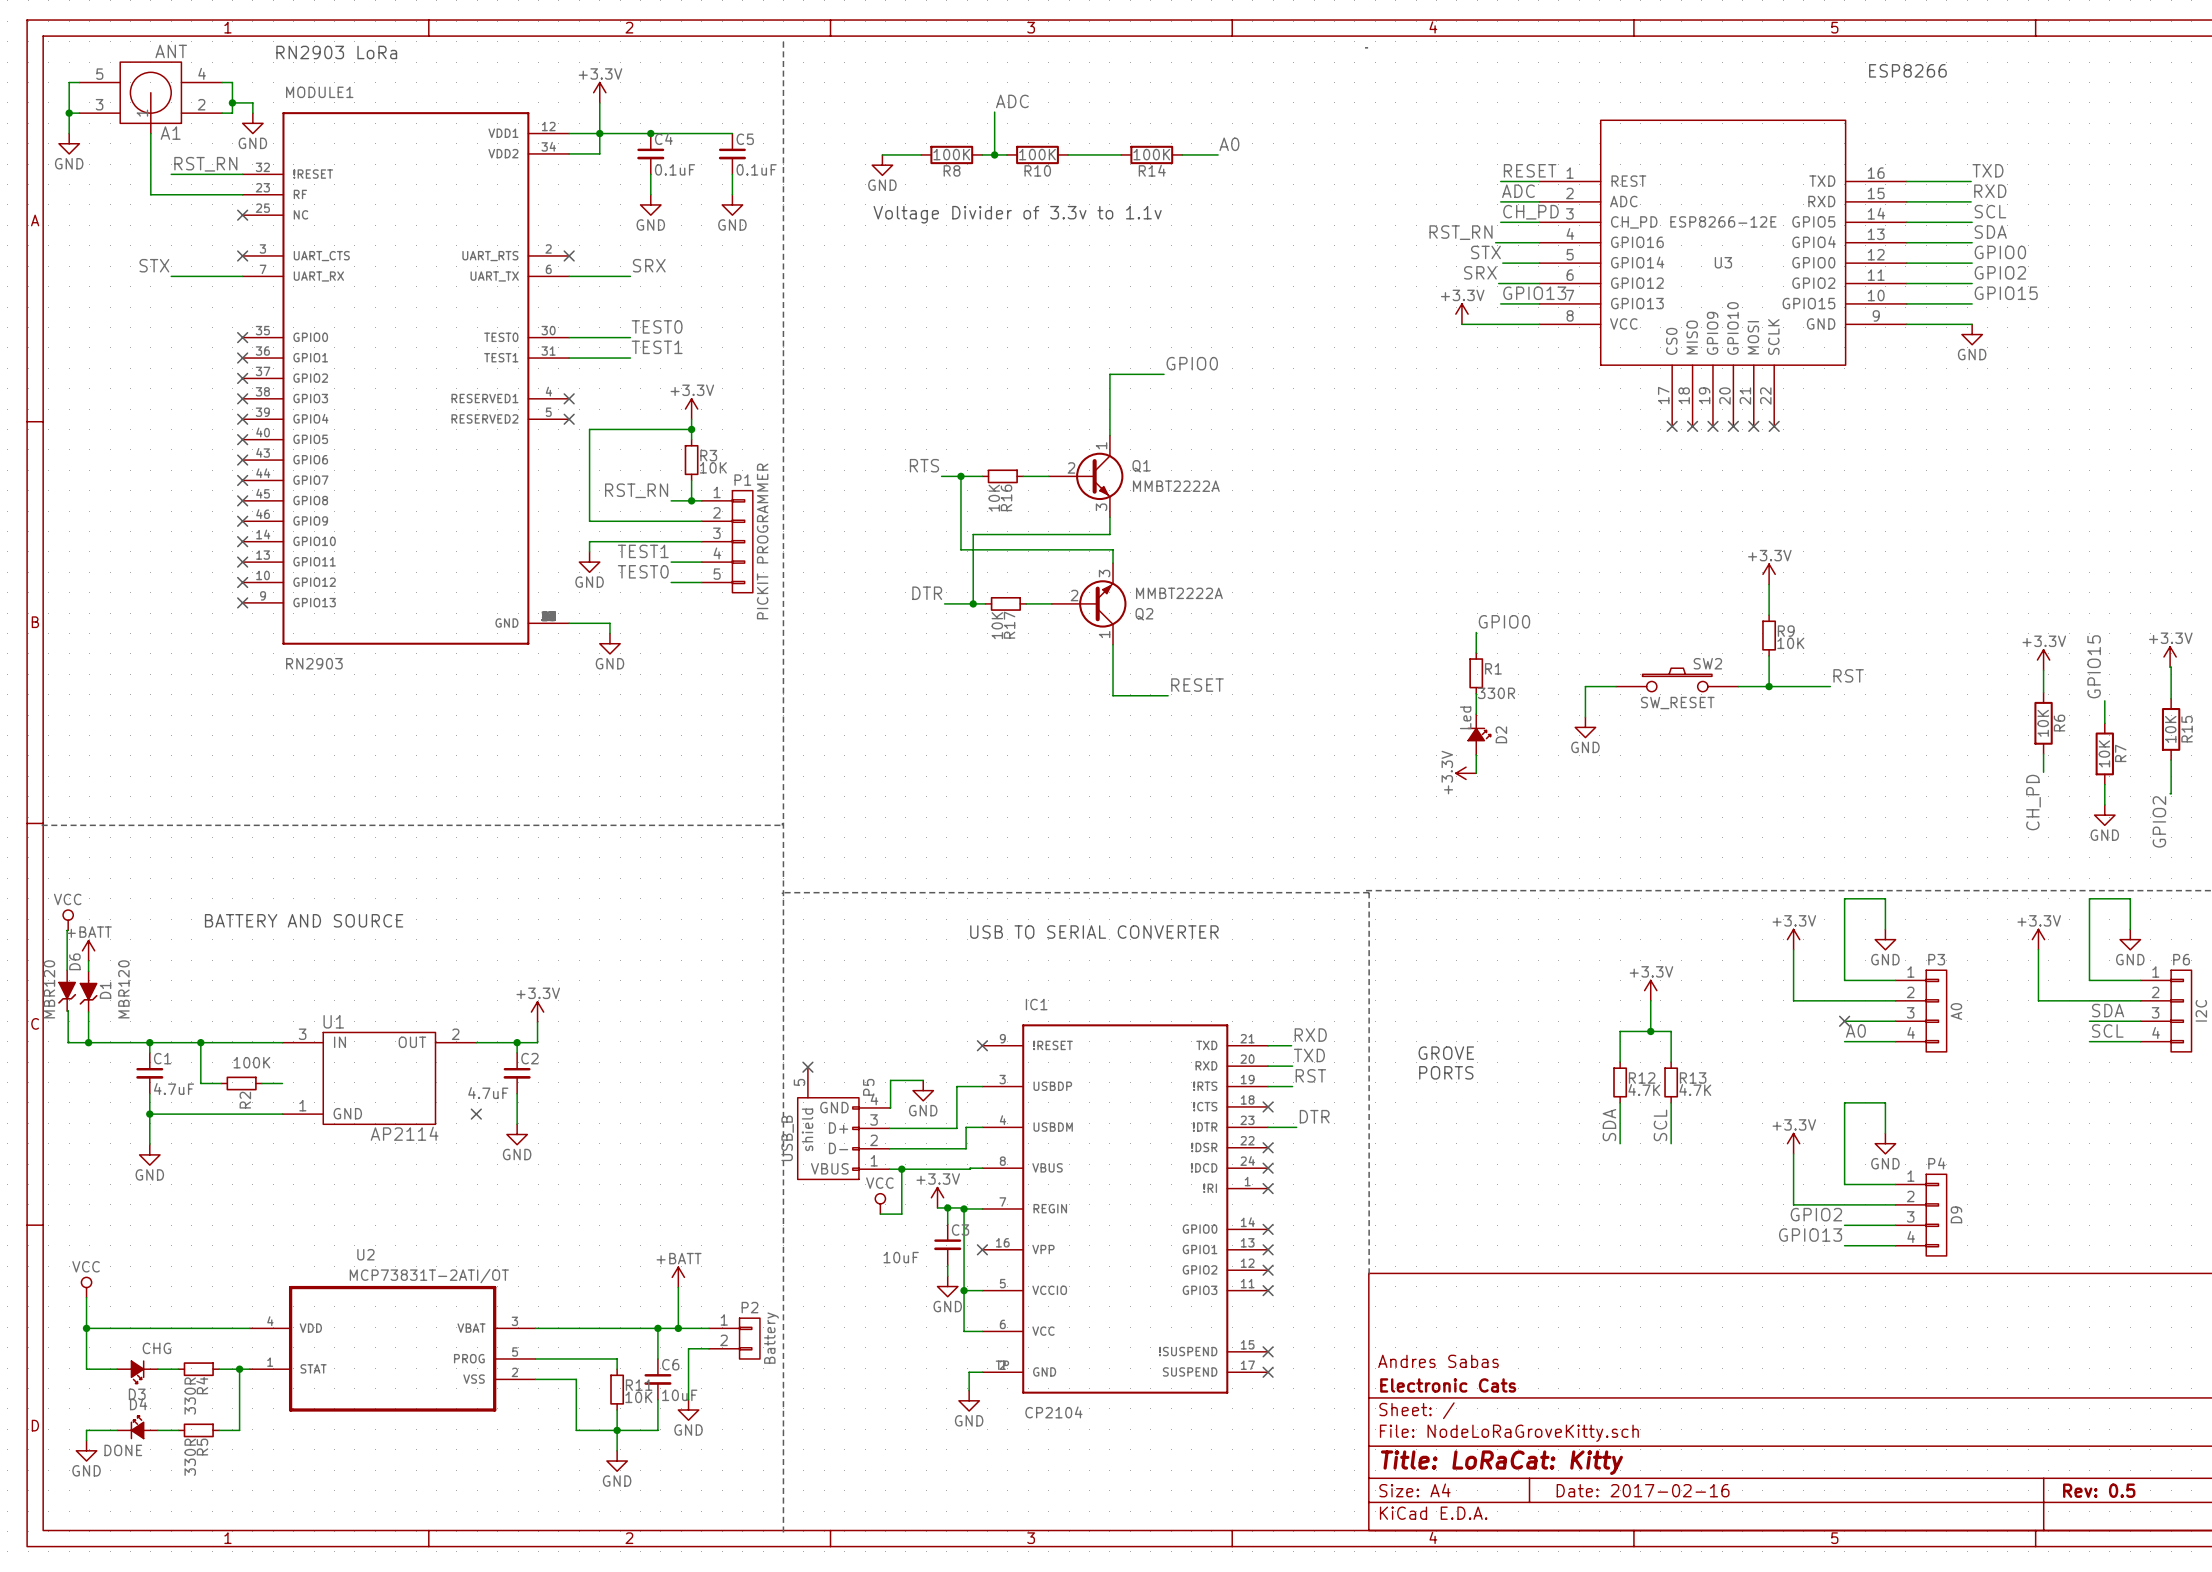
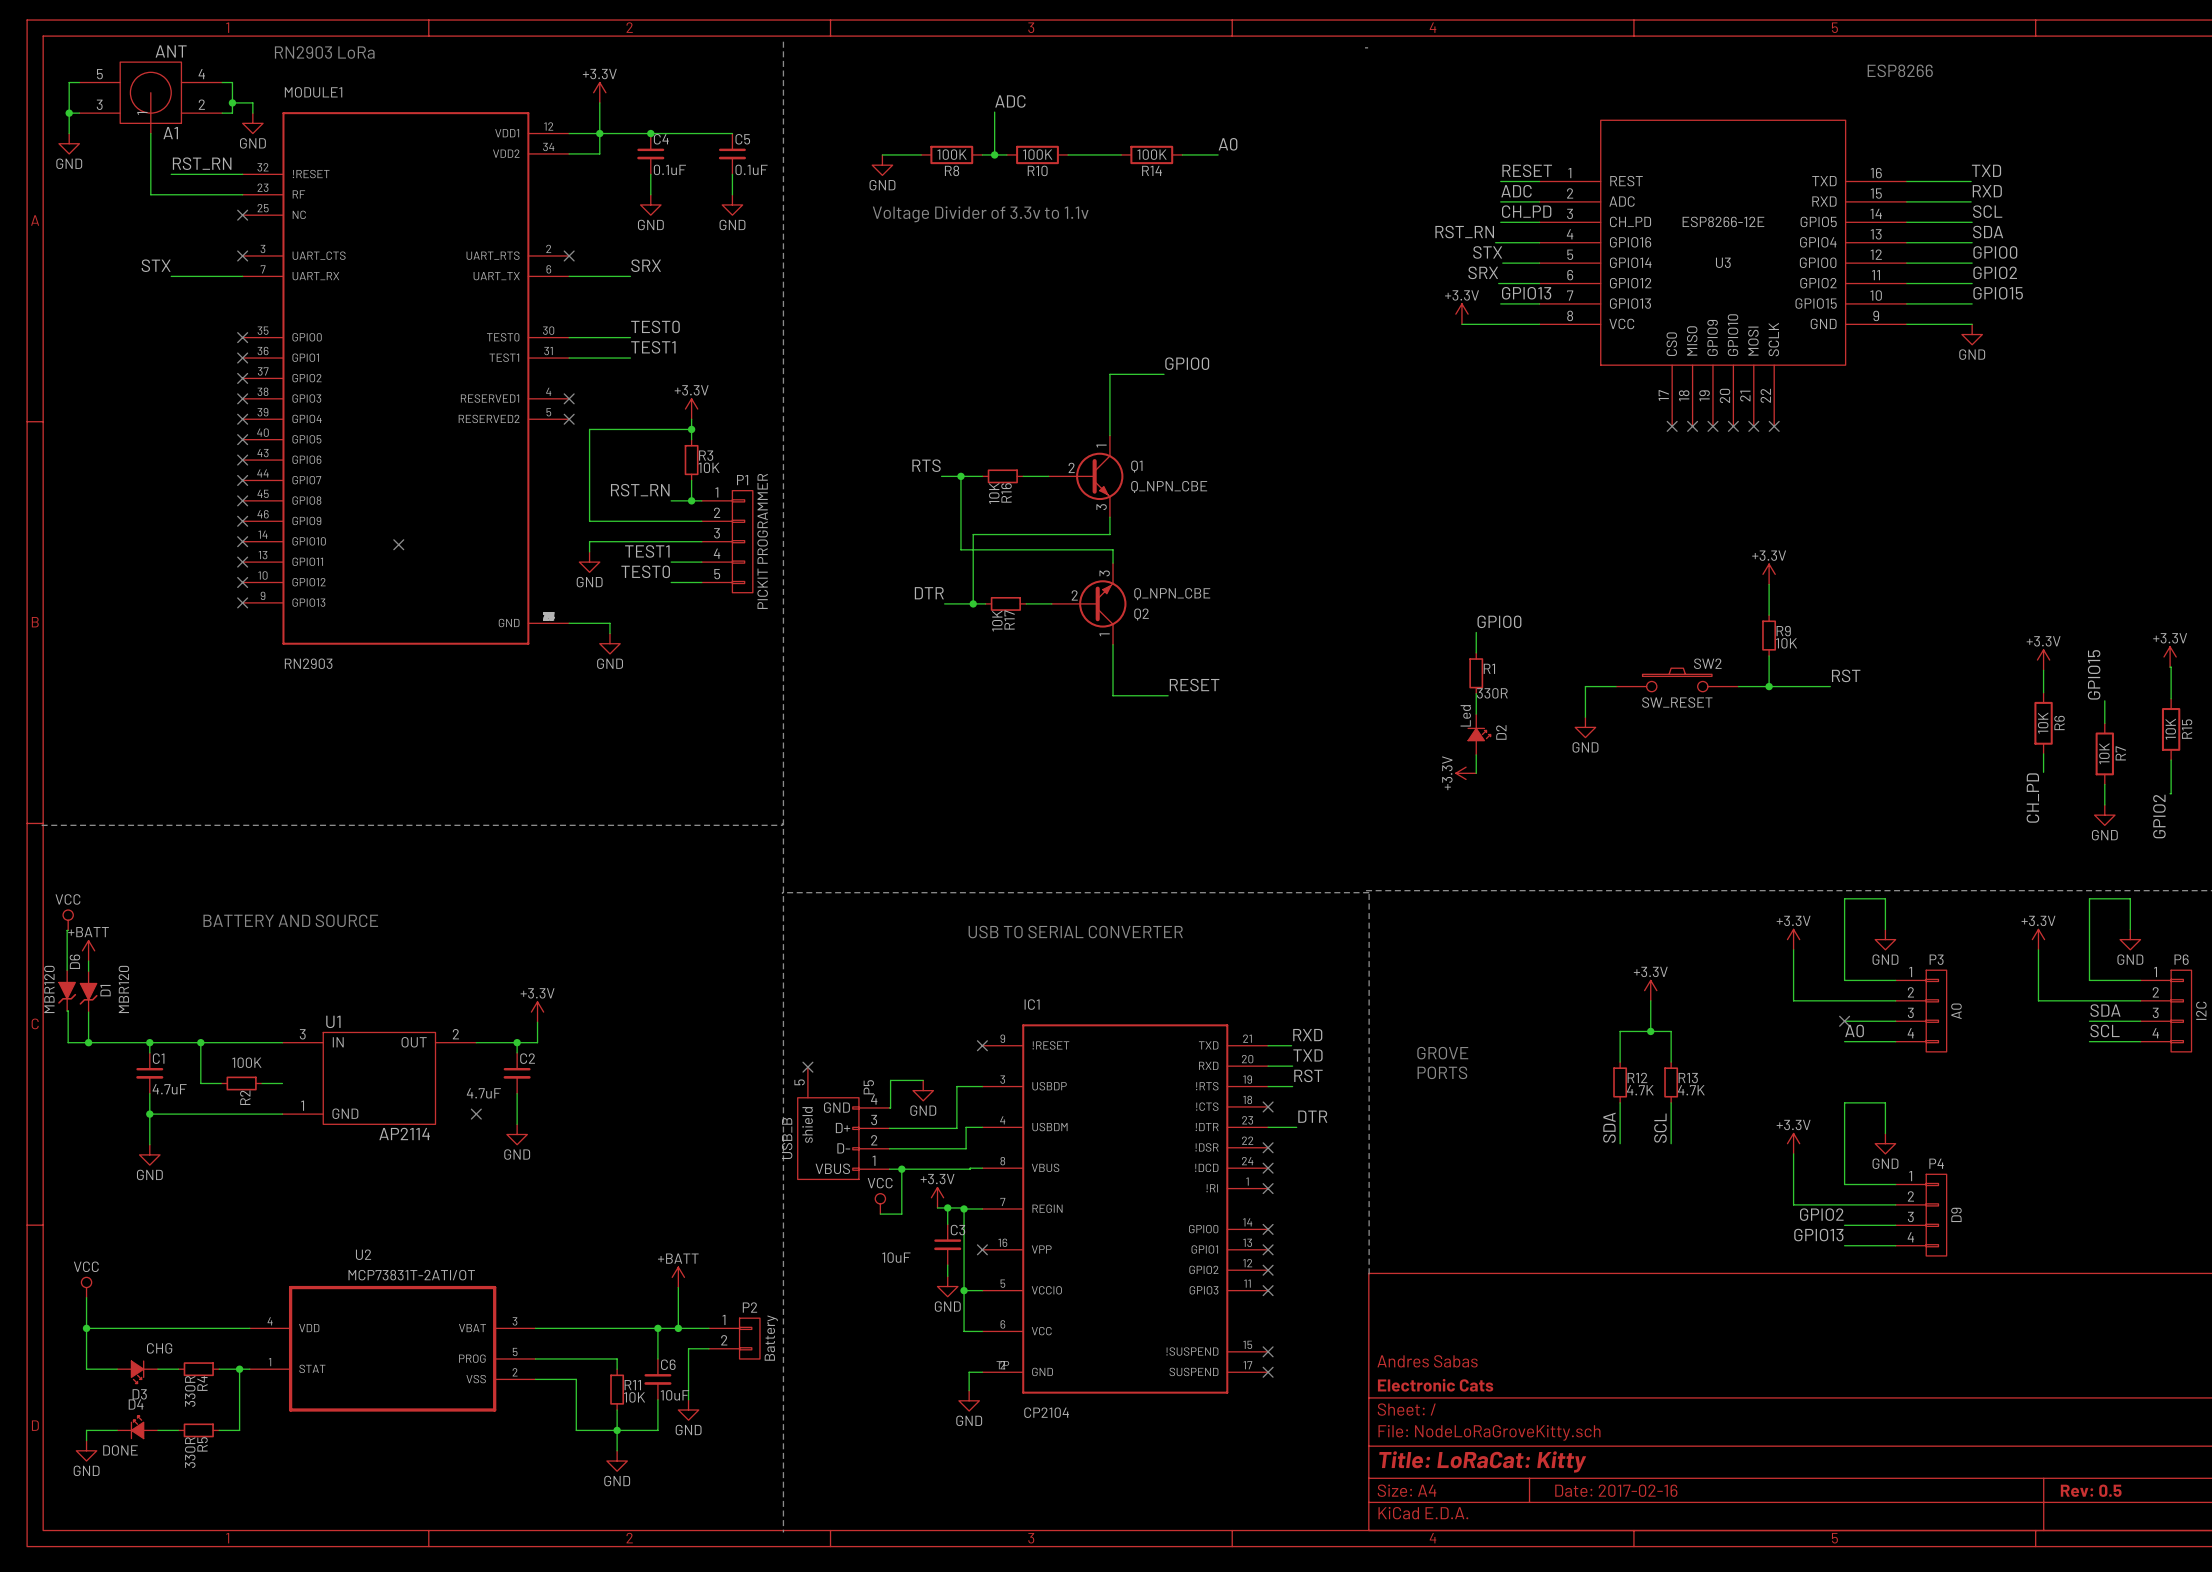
Q1 value: MMBT2222A (1176, 486) -> Q_NPN_CBE (1169, 486)
no-connect mark: none -> (398, 544)
Q2 value: MMBT2222A (1179, 593) -> Q_NPN_CBE (1172, 594)

